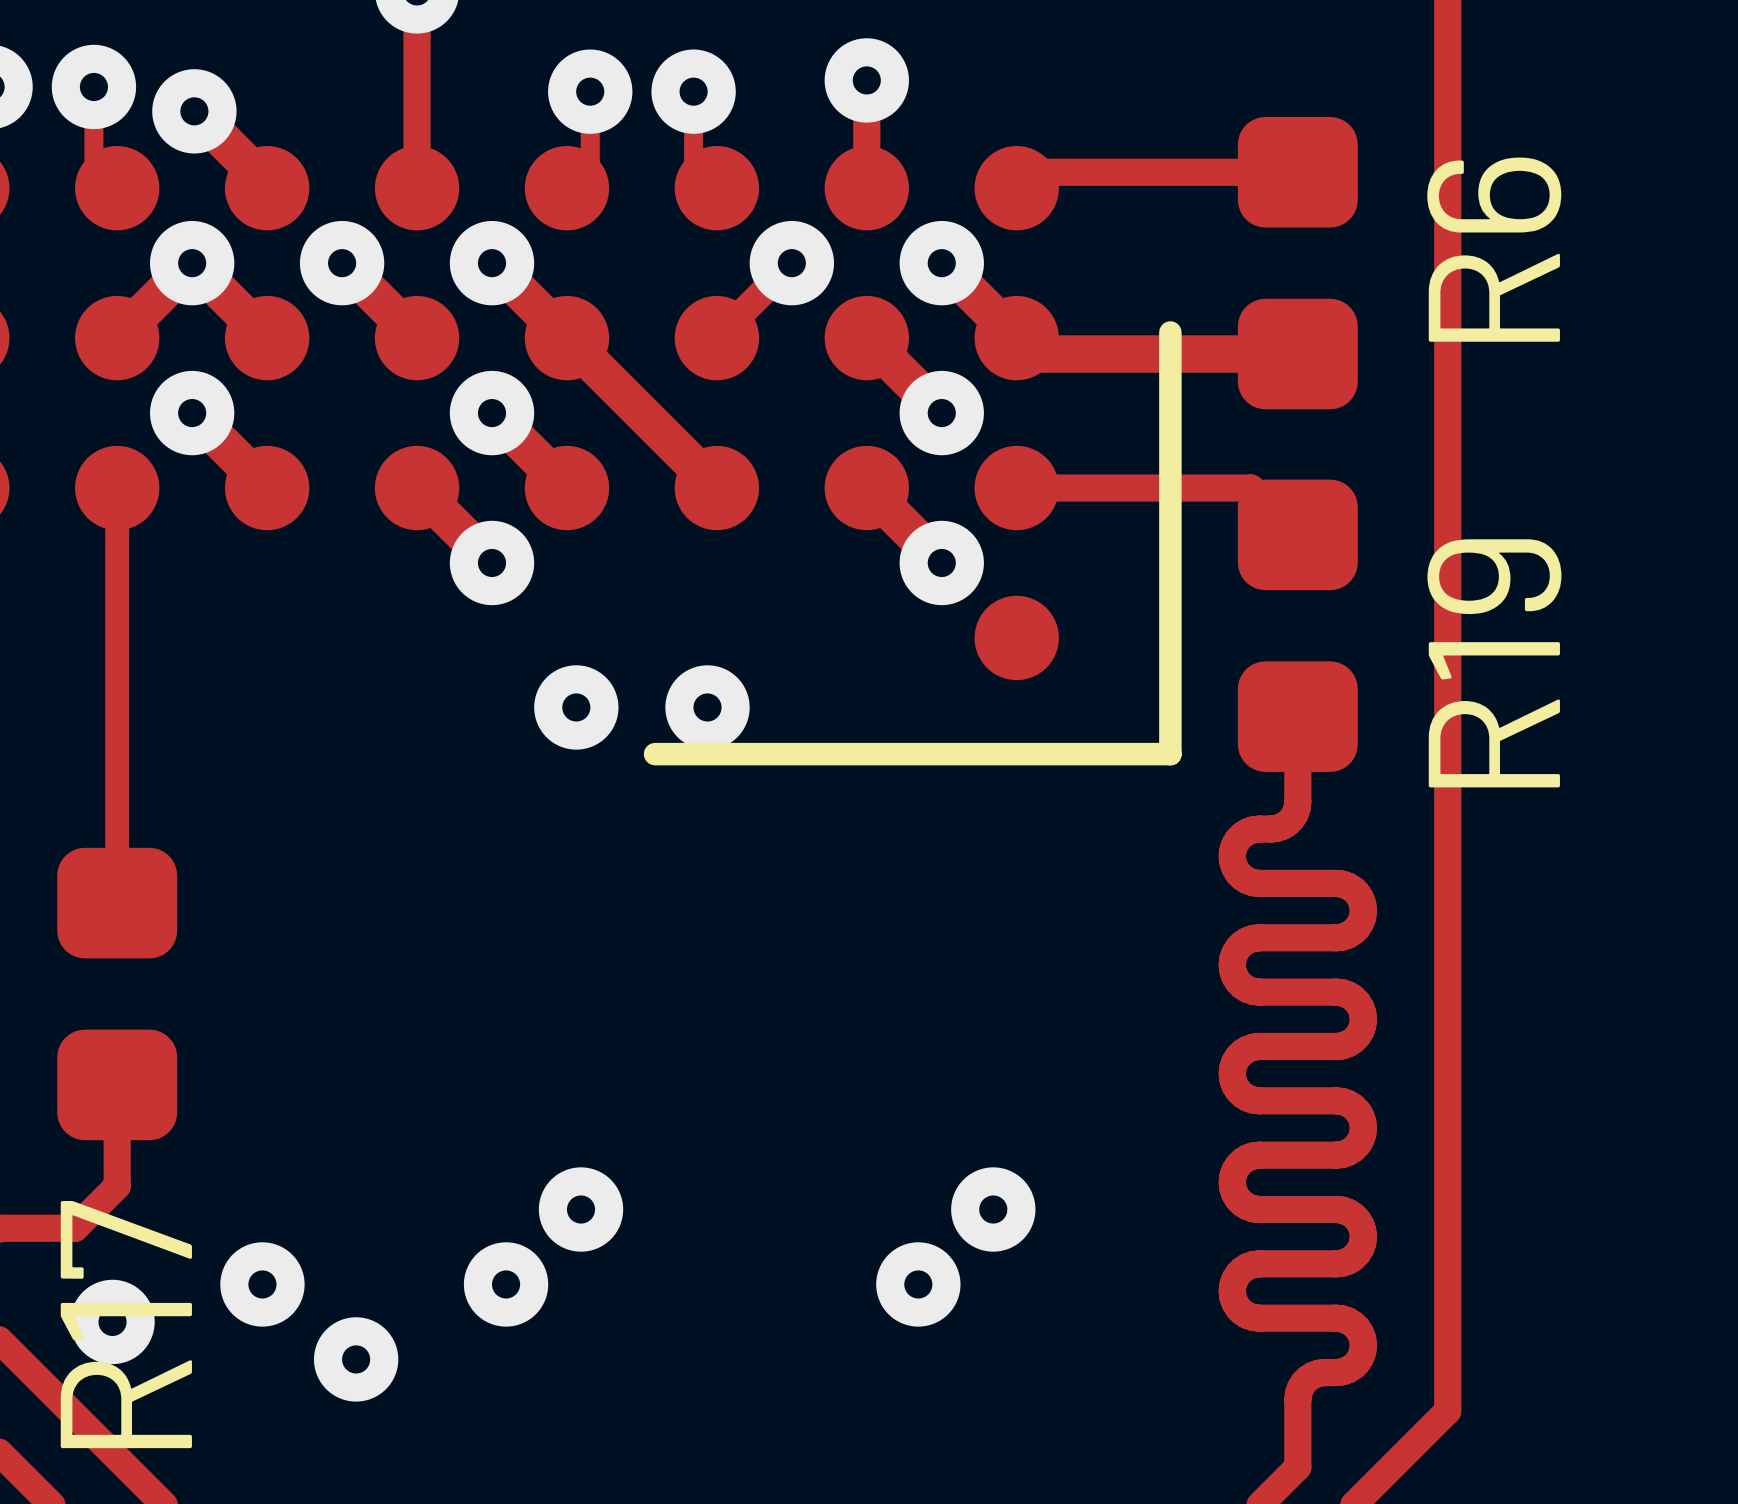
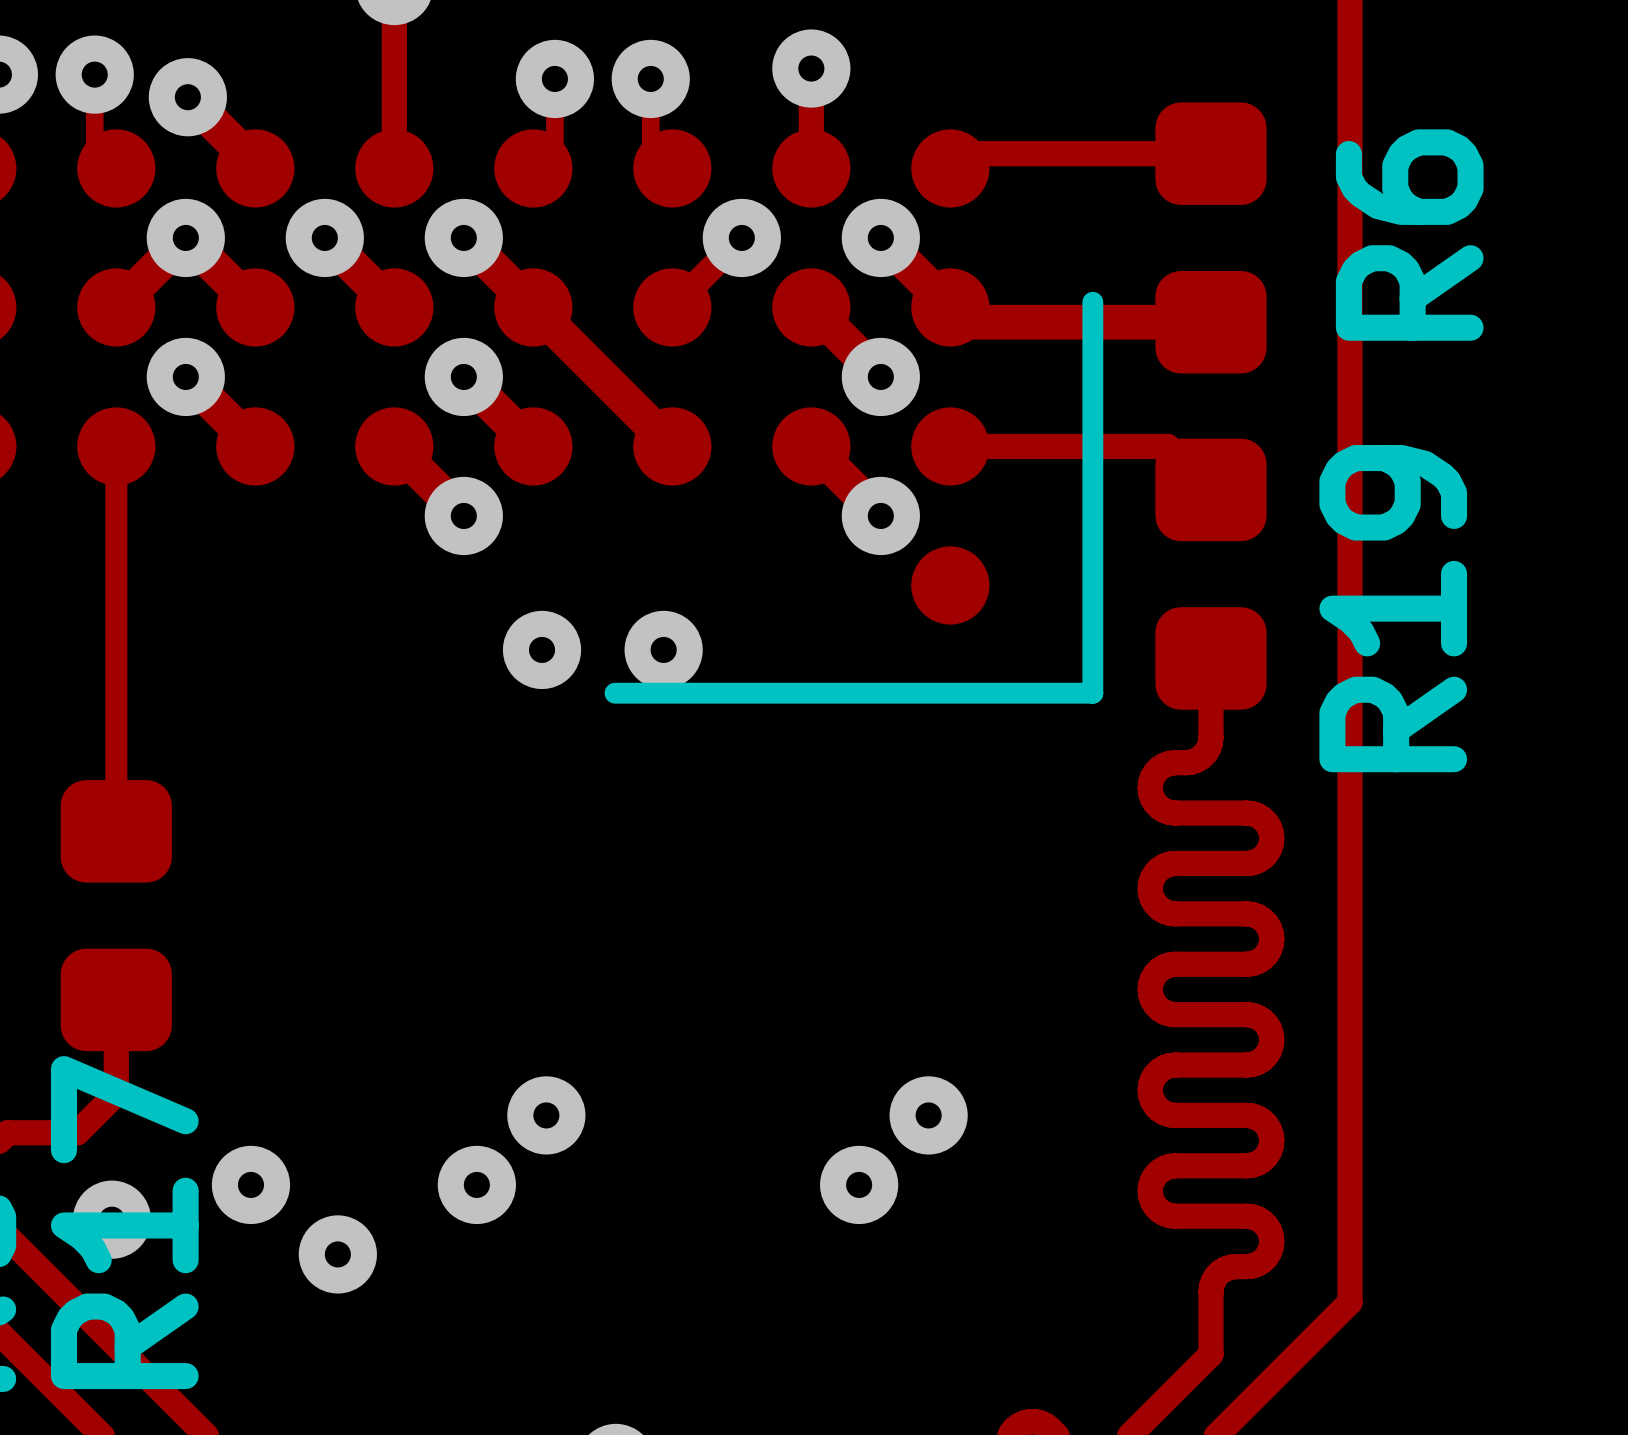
R6 name position: R6 (1494, 249) -> R6 (1409, 235)

